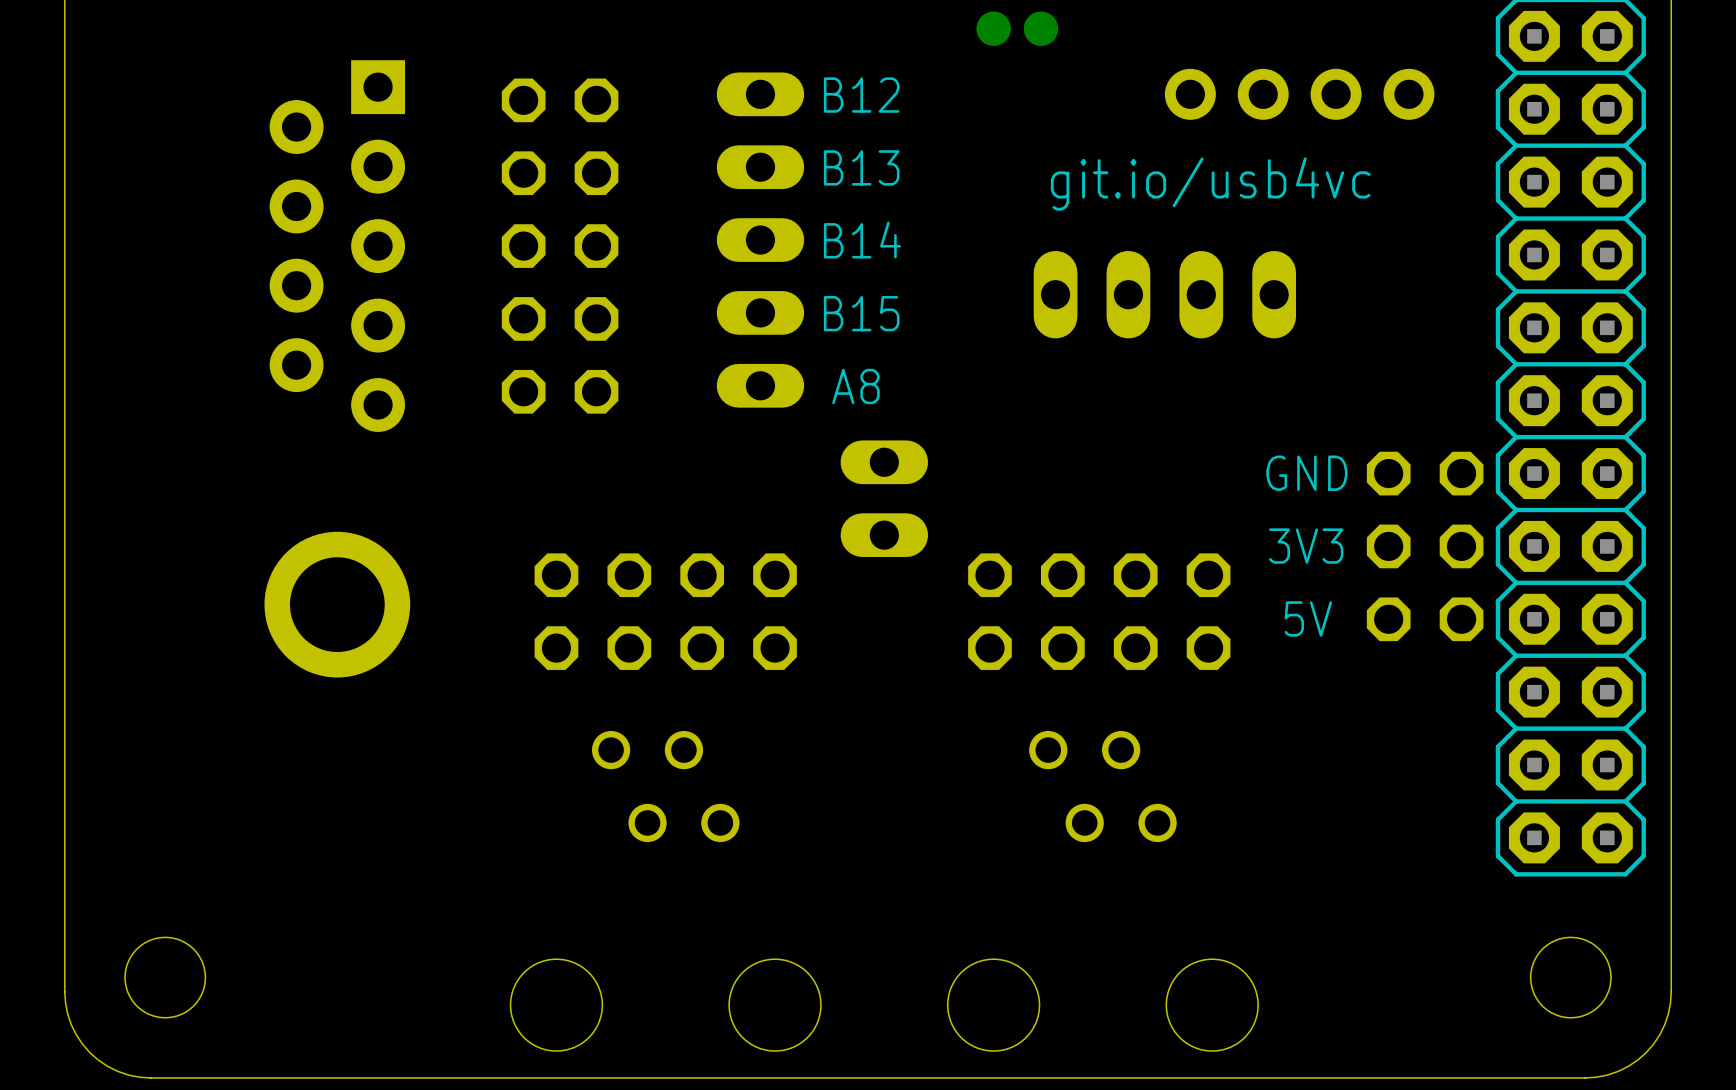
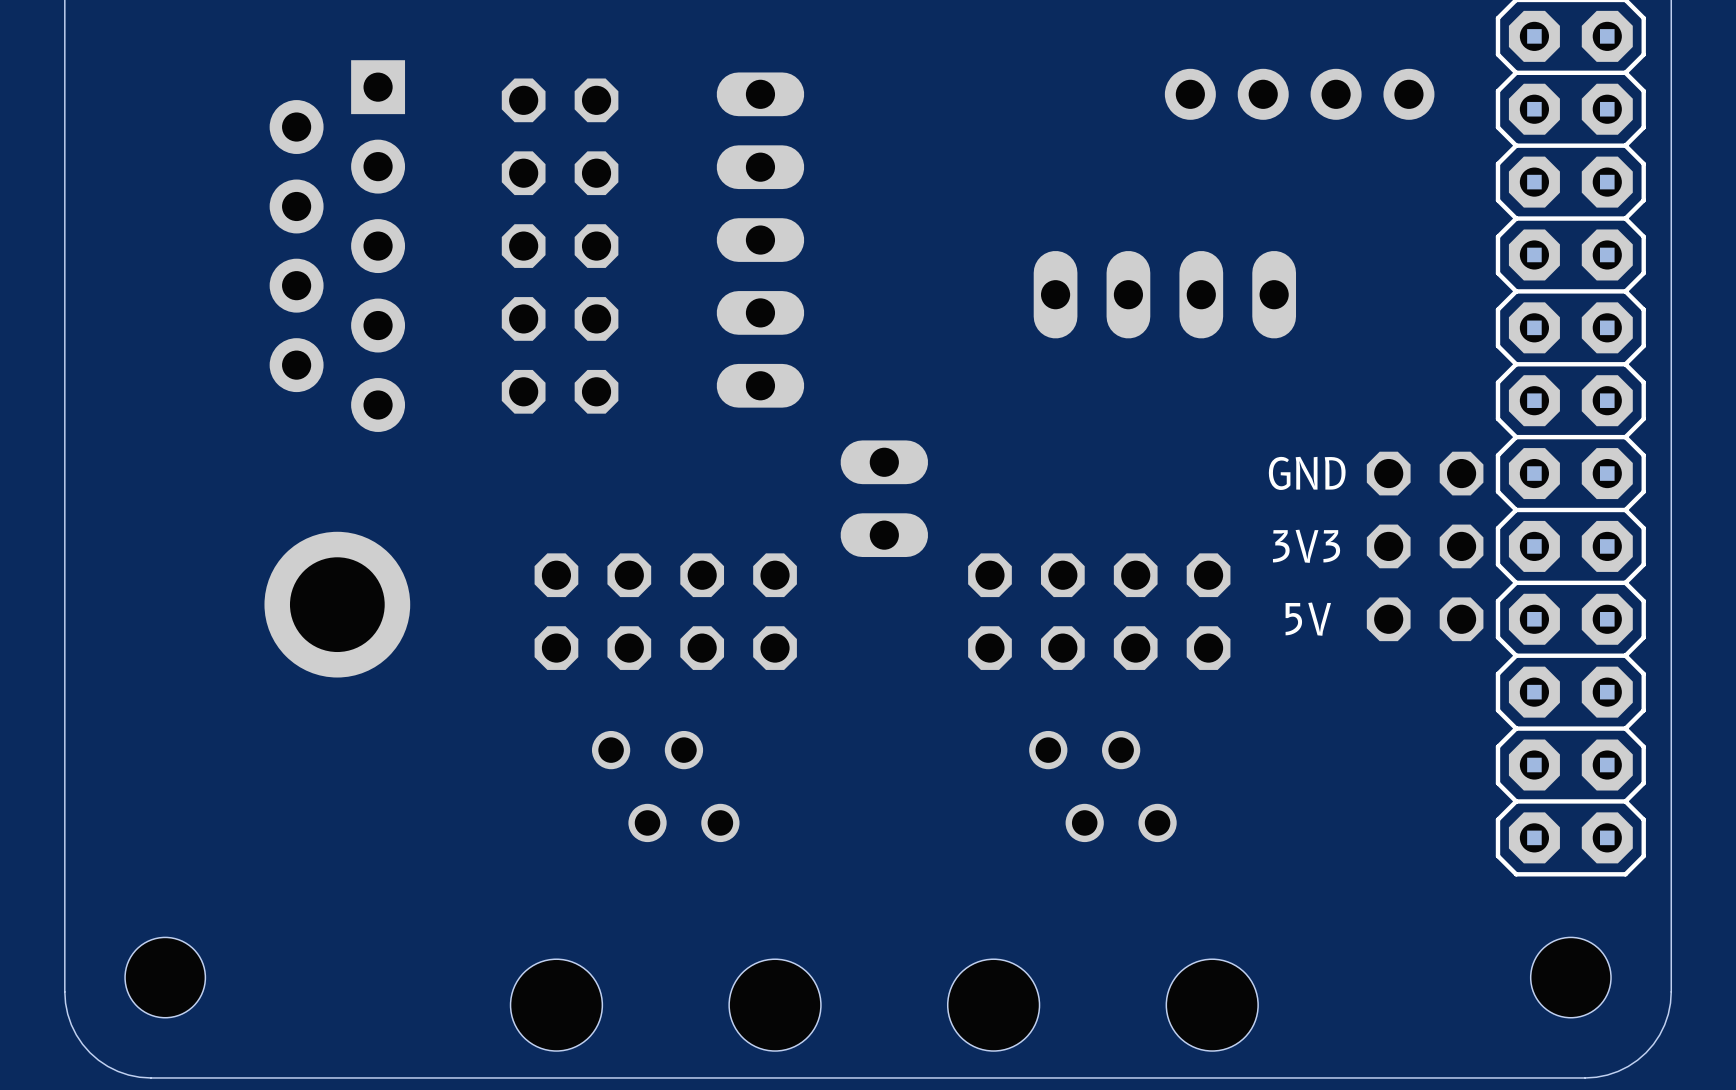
part: (993, 28) -> none
part: (1040, 28) -> none
text: B12 (861, 95) -> none
text: B13 (861, 167) -> none
text: git.io/usb4vc (1210, 184) -> none
text: B14 (862, 240) -> none
text: B15 (861, 313) -> none
text: A8 (855, 386) -> none

